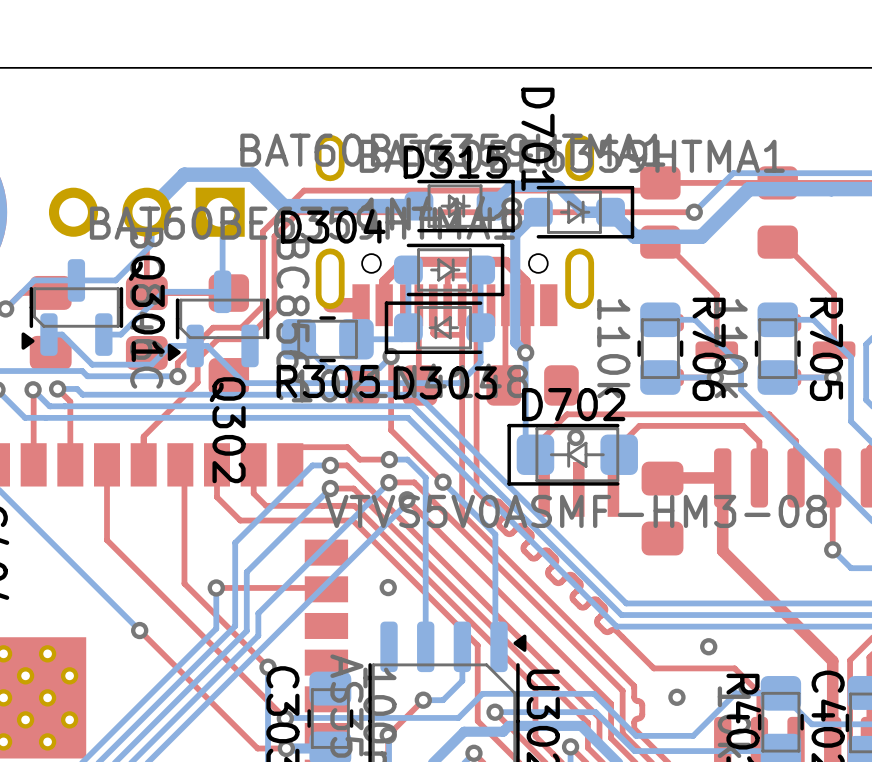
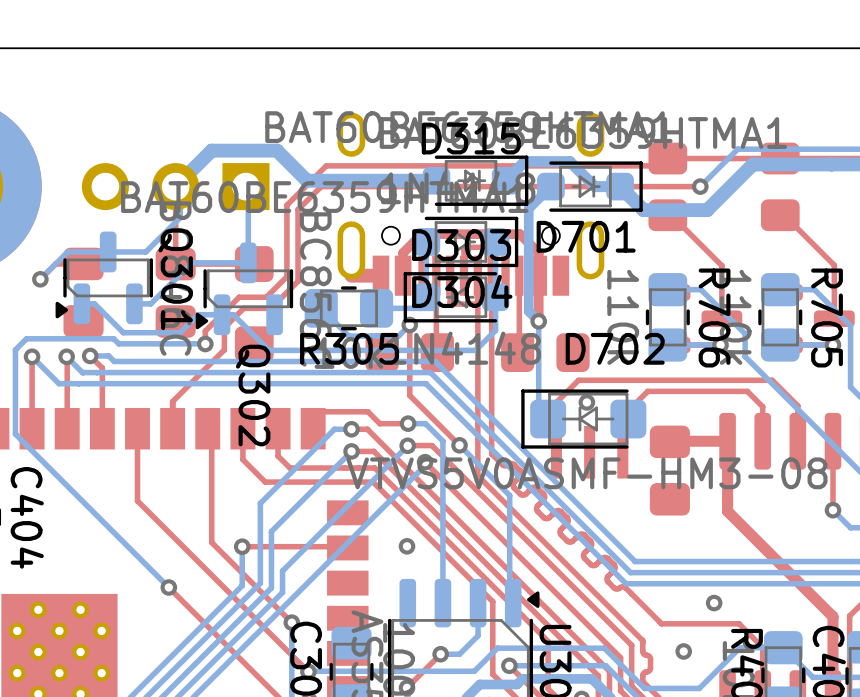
D701 name rotation: 0° (537, 139) -> 90° counterclockwise (586, 236)
D701 name position: D701 (537, 139) -> D701 (586, 236)
D304 name position: D304 (333, 226) -> D304 (462, 291)
D303 name position: D303 (445, 382) -> D303 (461, 245)
D702 name position: D702 (573, 404) -> D702 (615, 348)

